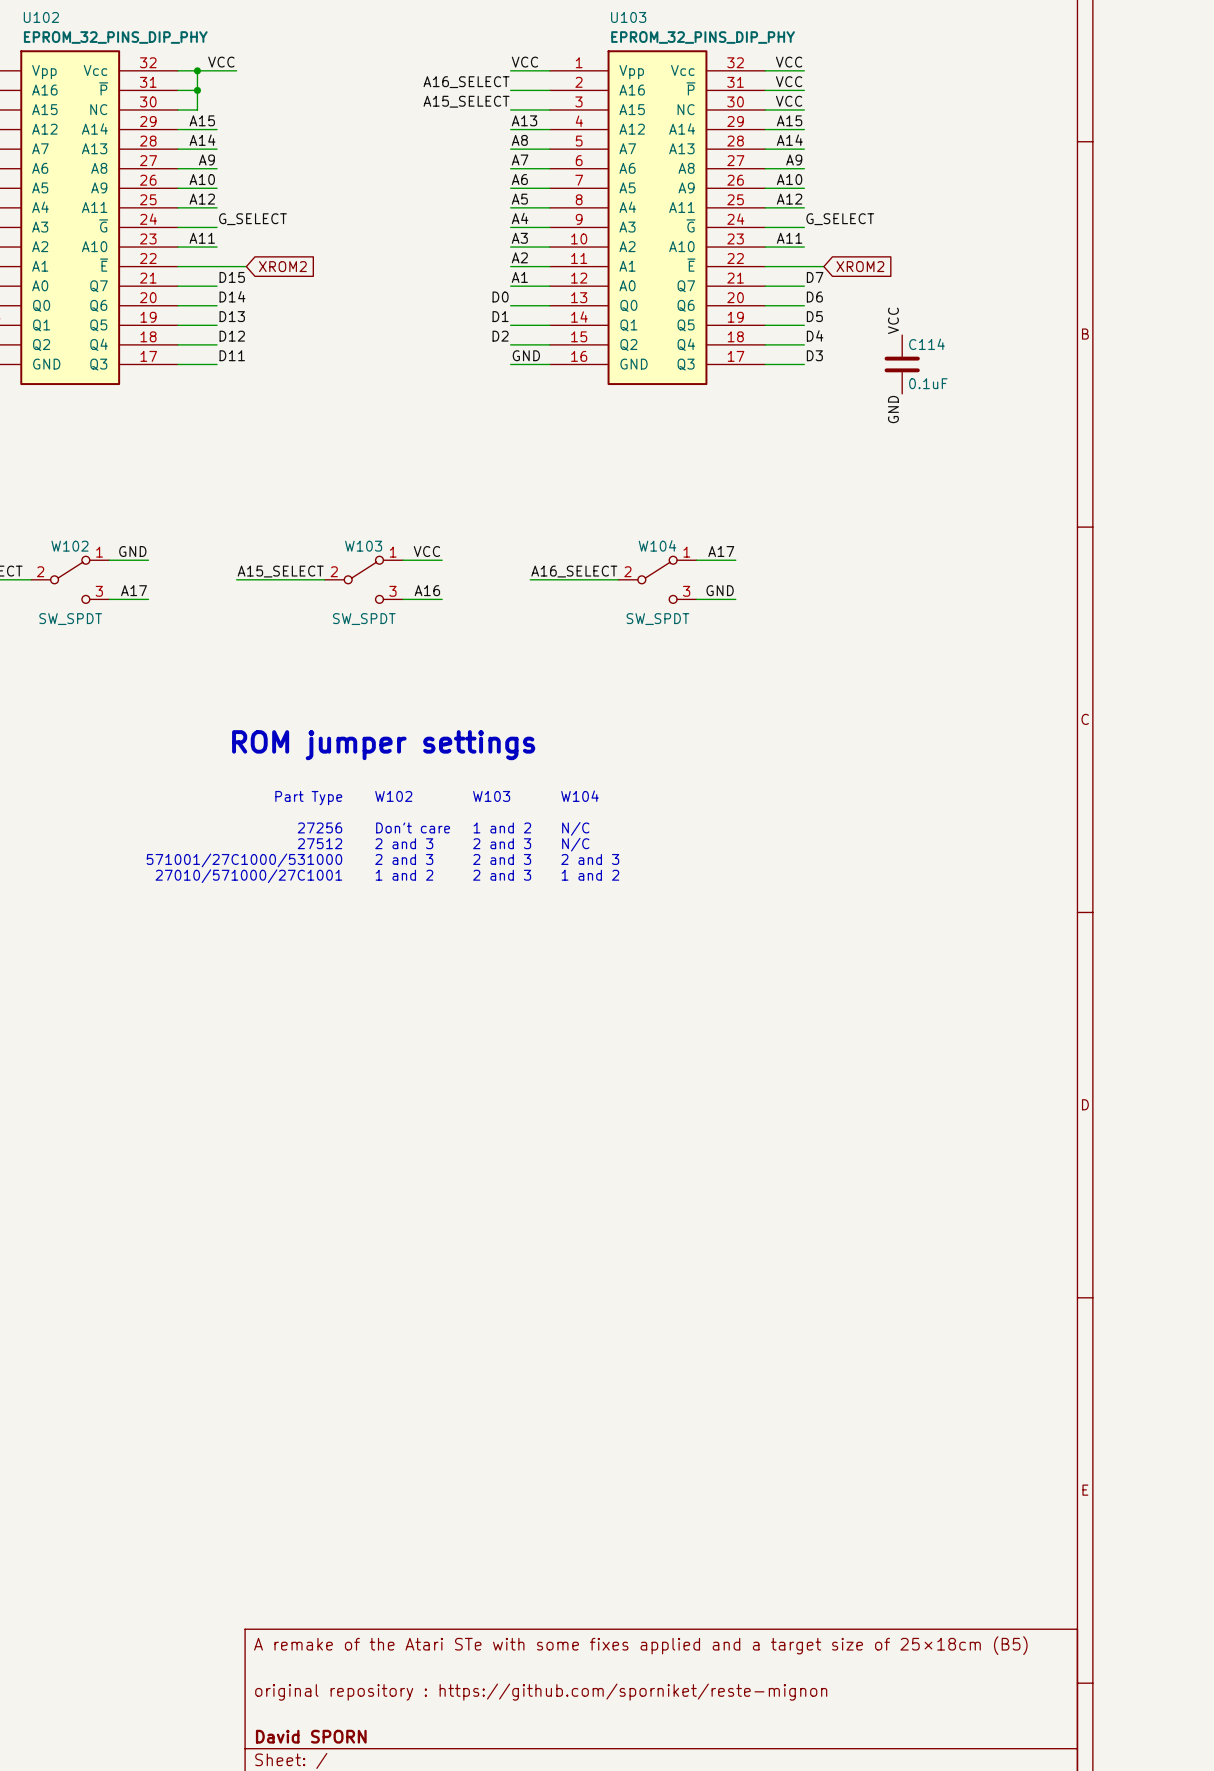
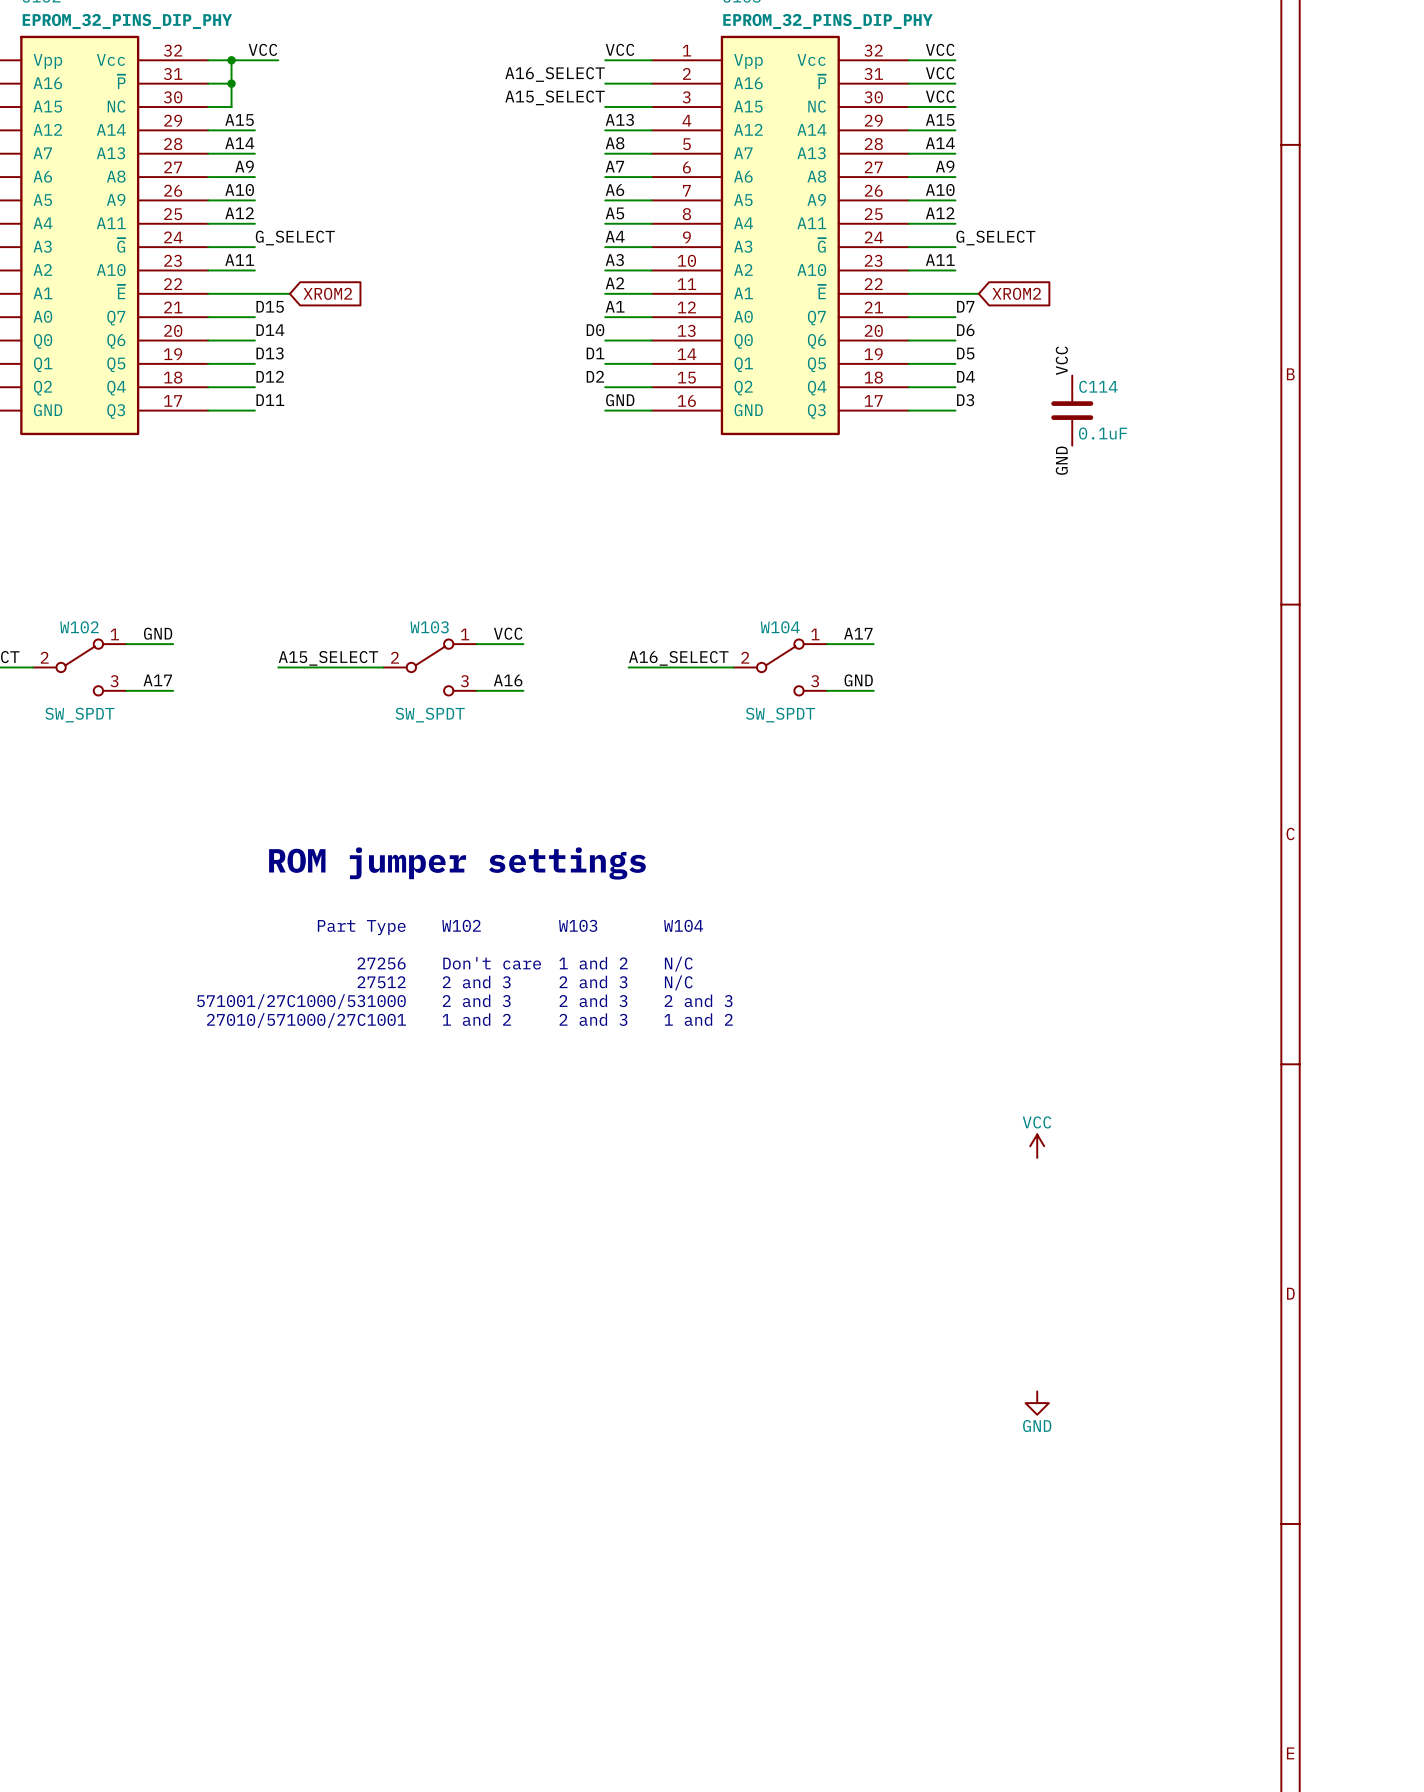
power symbol: none -> VCC (1037, 1146)
power symbol: none -> GND (1037, 1403)

